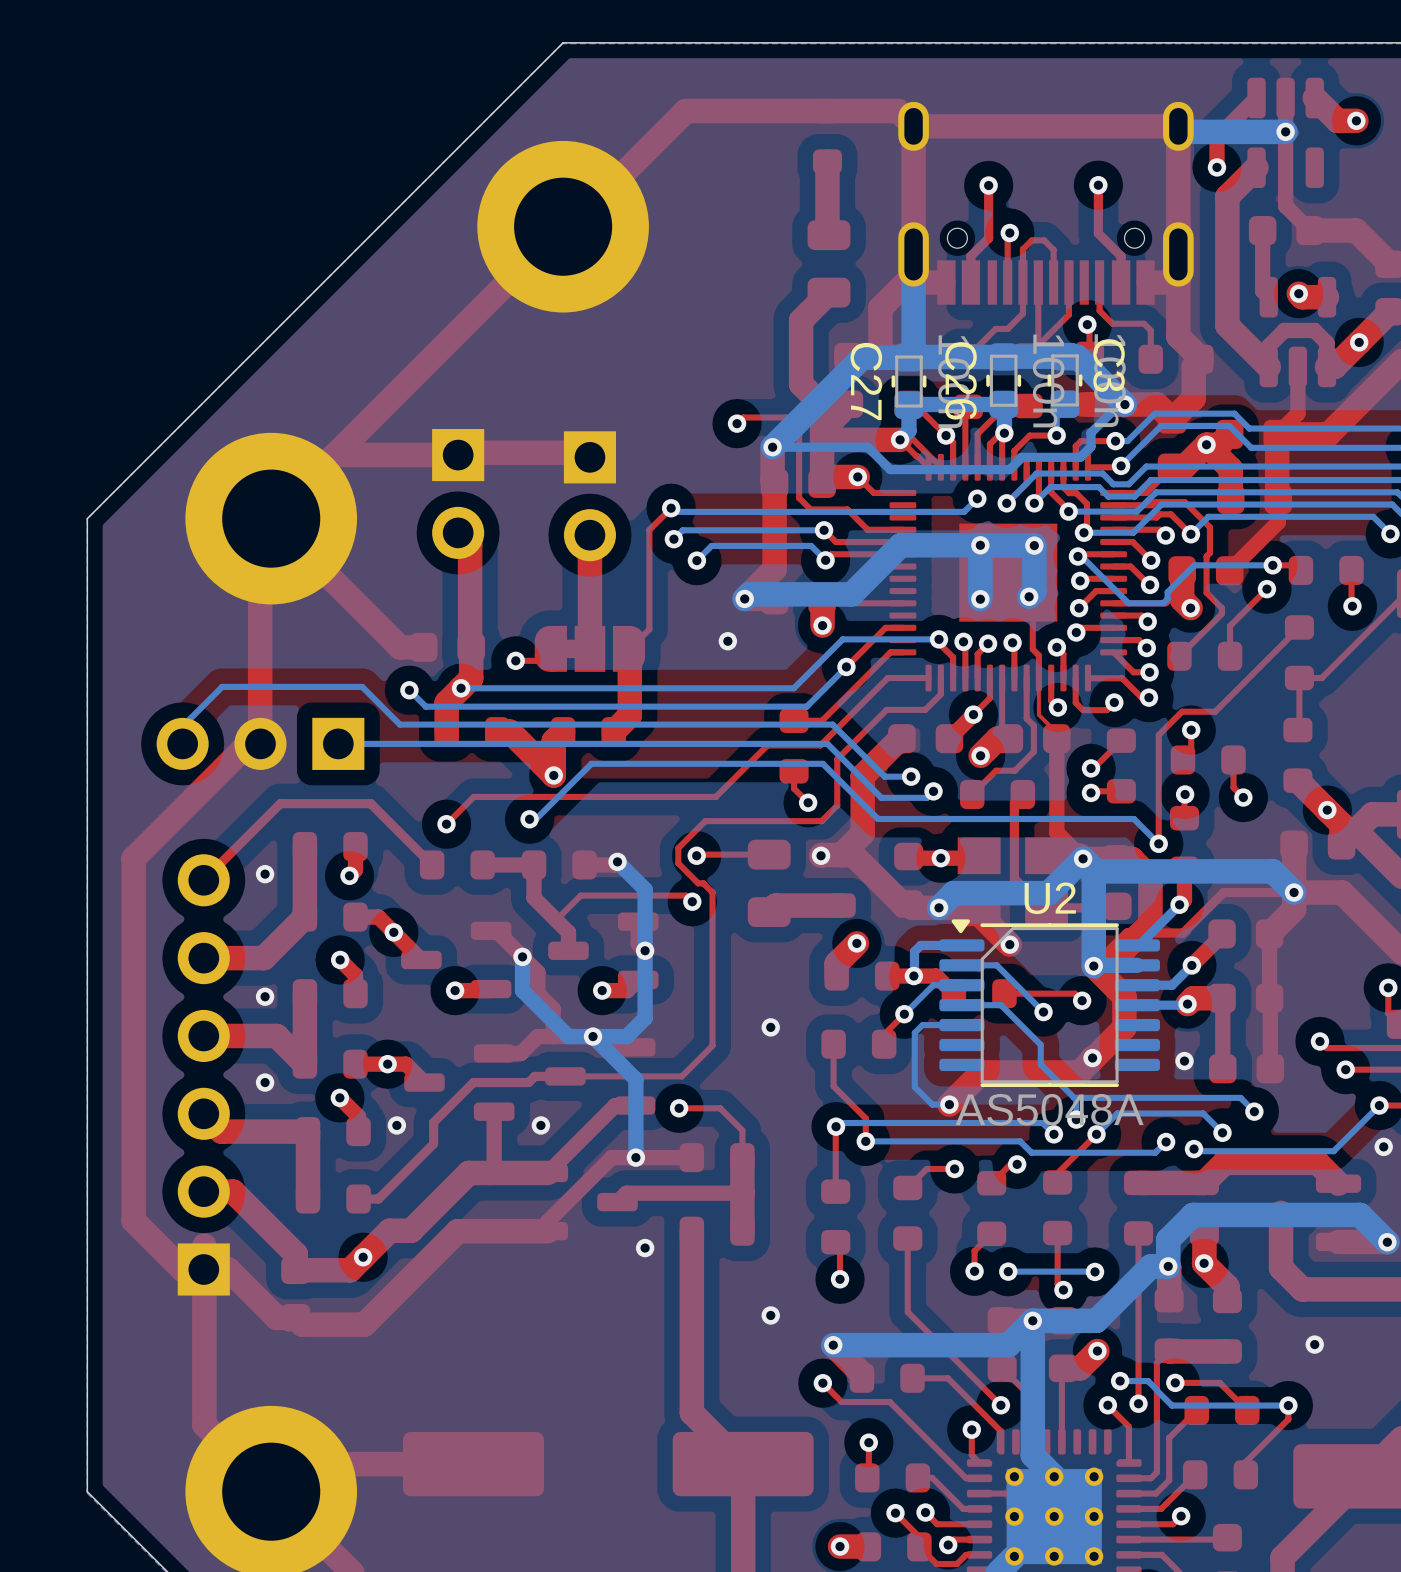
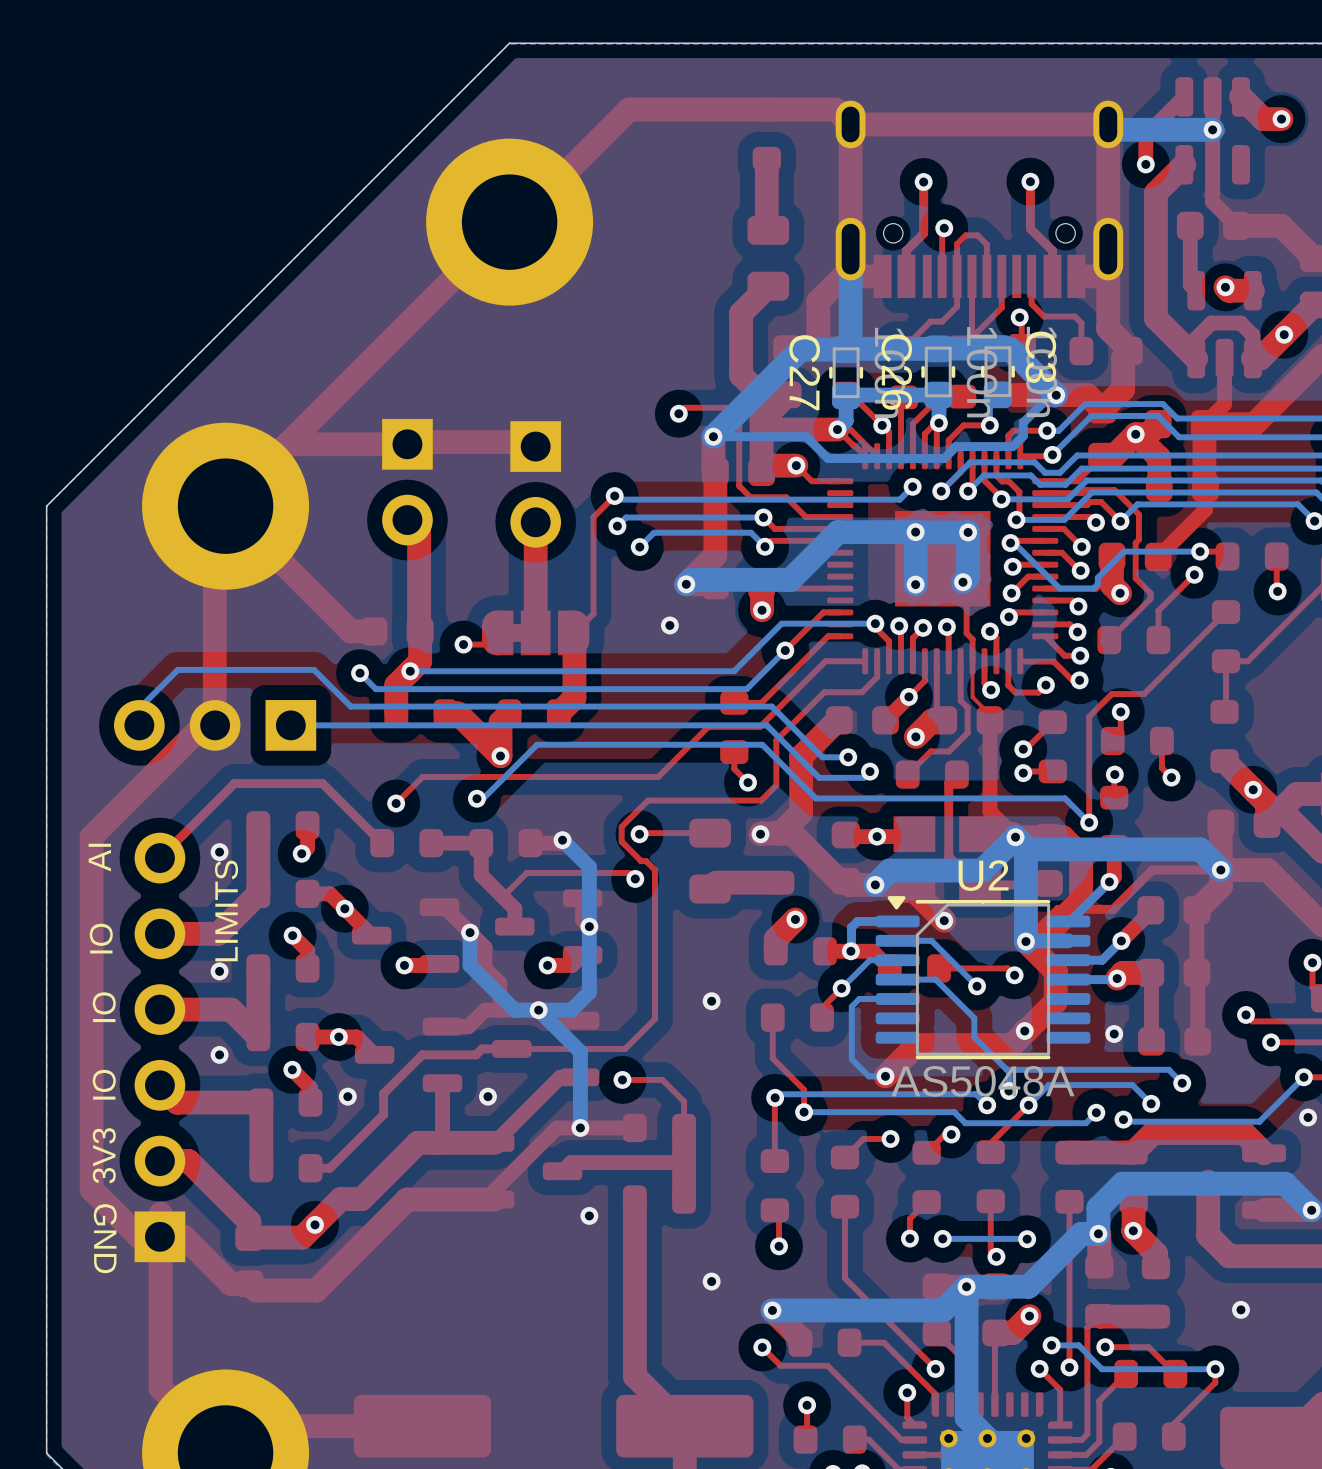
text: none -> AI (99, 857)
text: none -> LIMITS (226, 910)
text: none -> IO (101, 938)
text: none -> IO (104, 1007)
text: none -> IO (104, 1084)
text: none -> 3V3 (104, 1155)
text: none -> GND (105, 1238)

